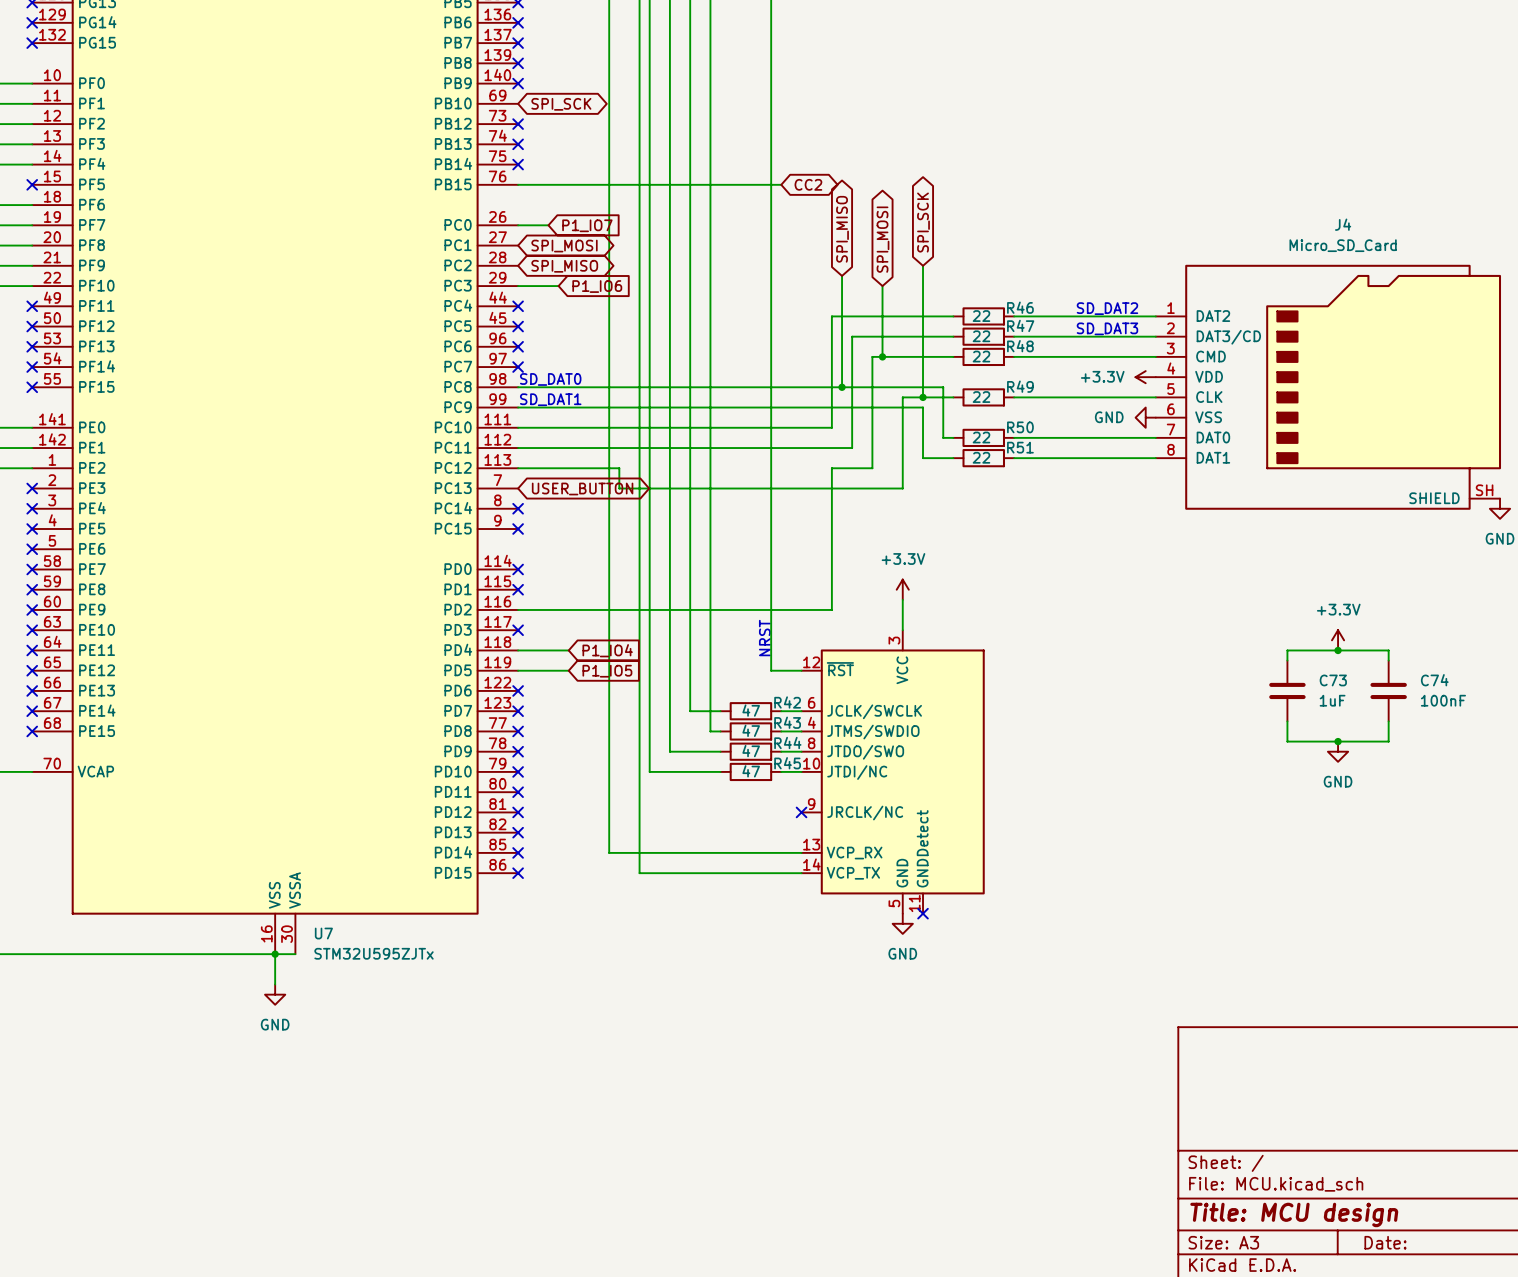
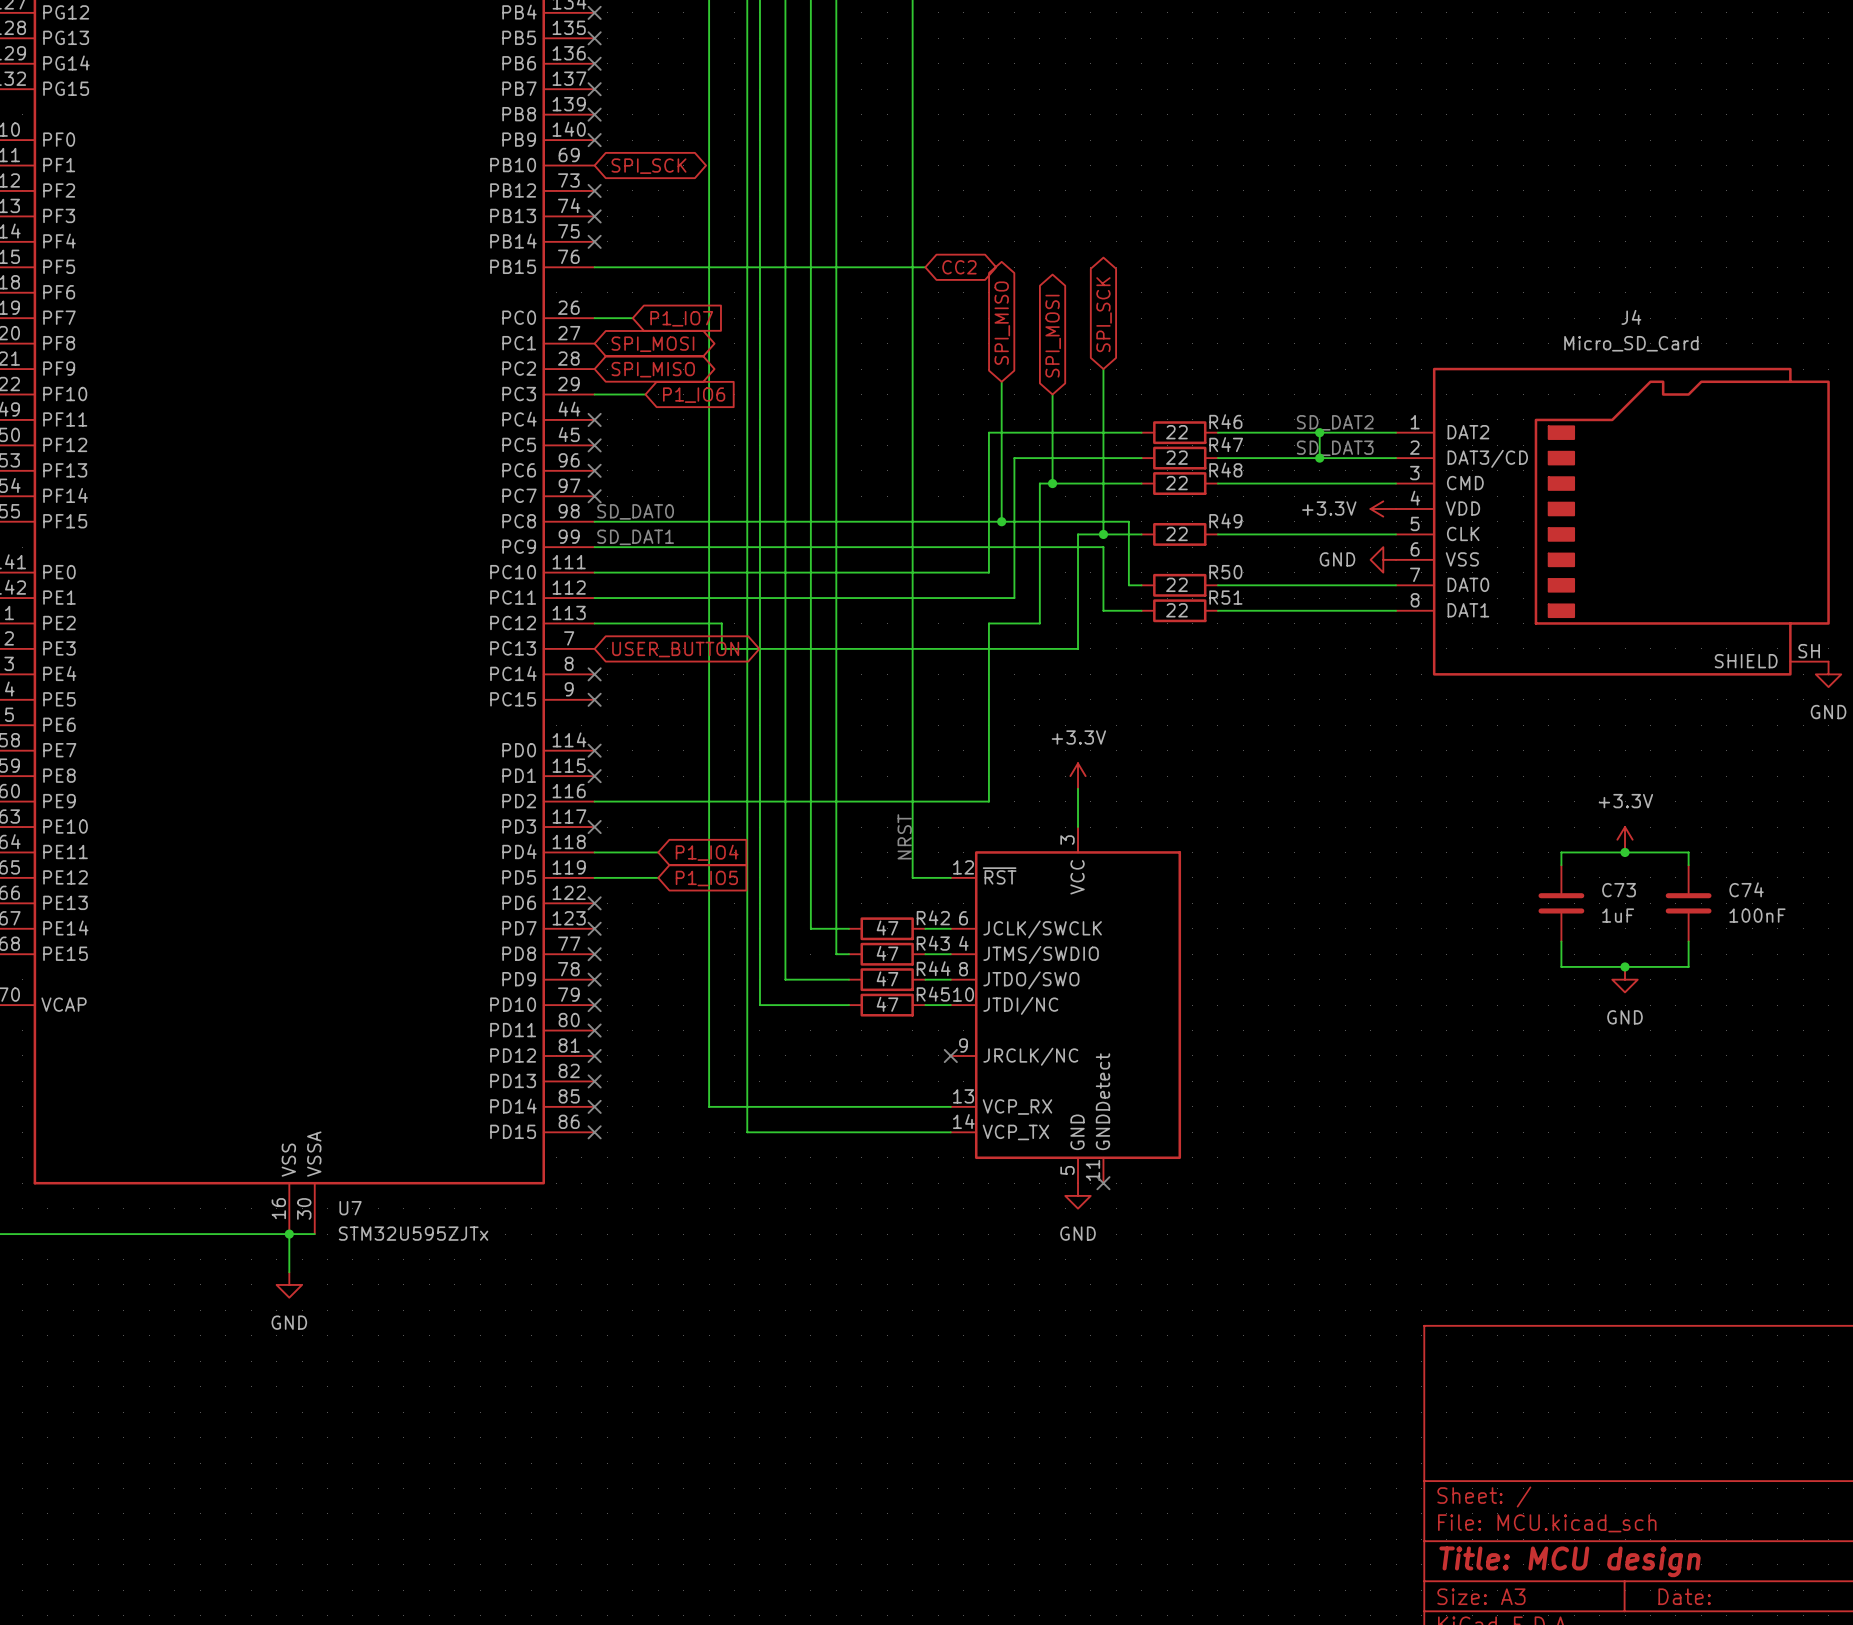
wire: none -> (1319, 432) (1319, 458)
junction: none -> (1319, 432)
junction: none -> (1319, 458)

